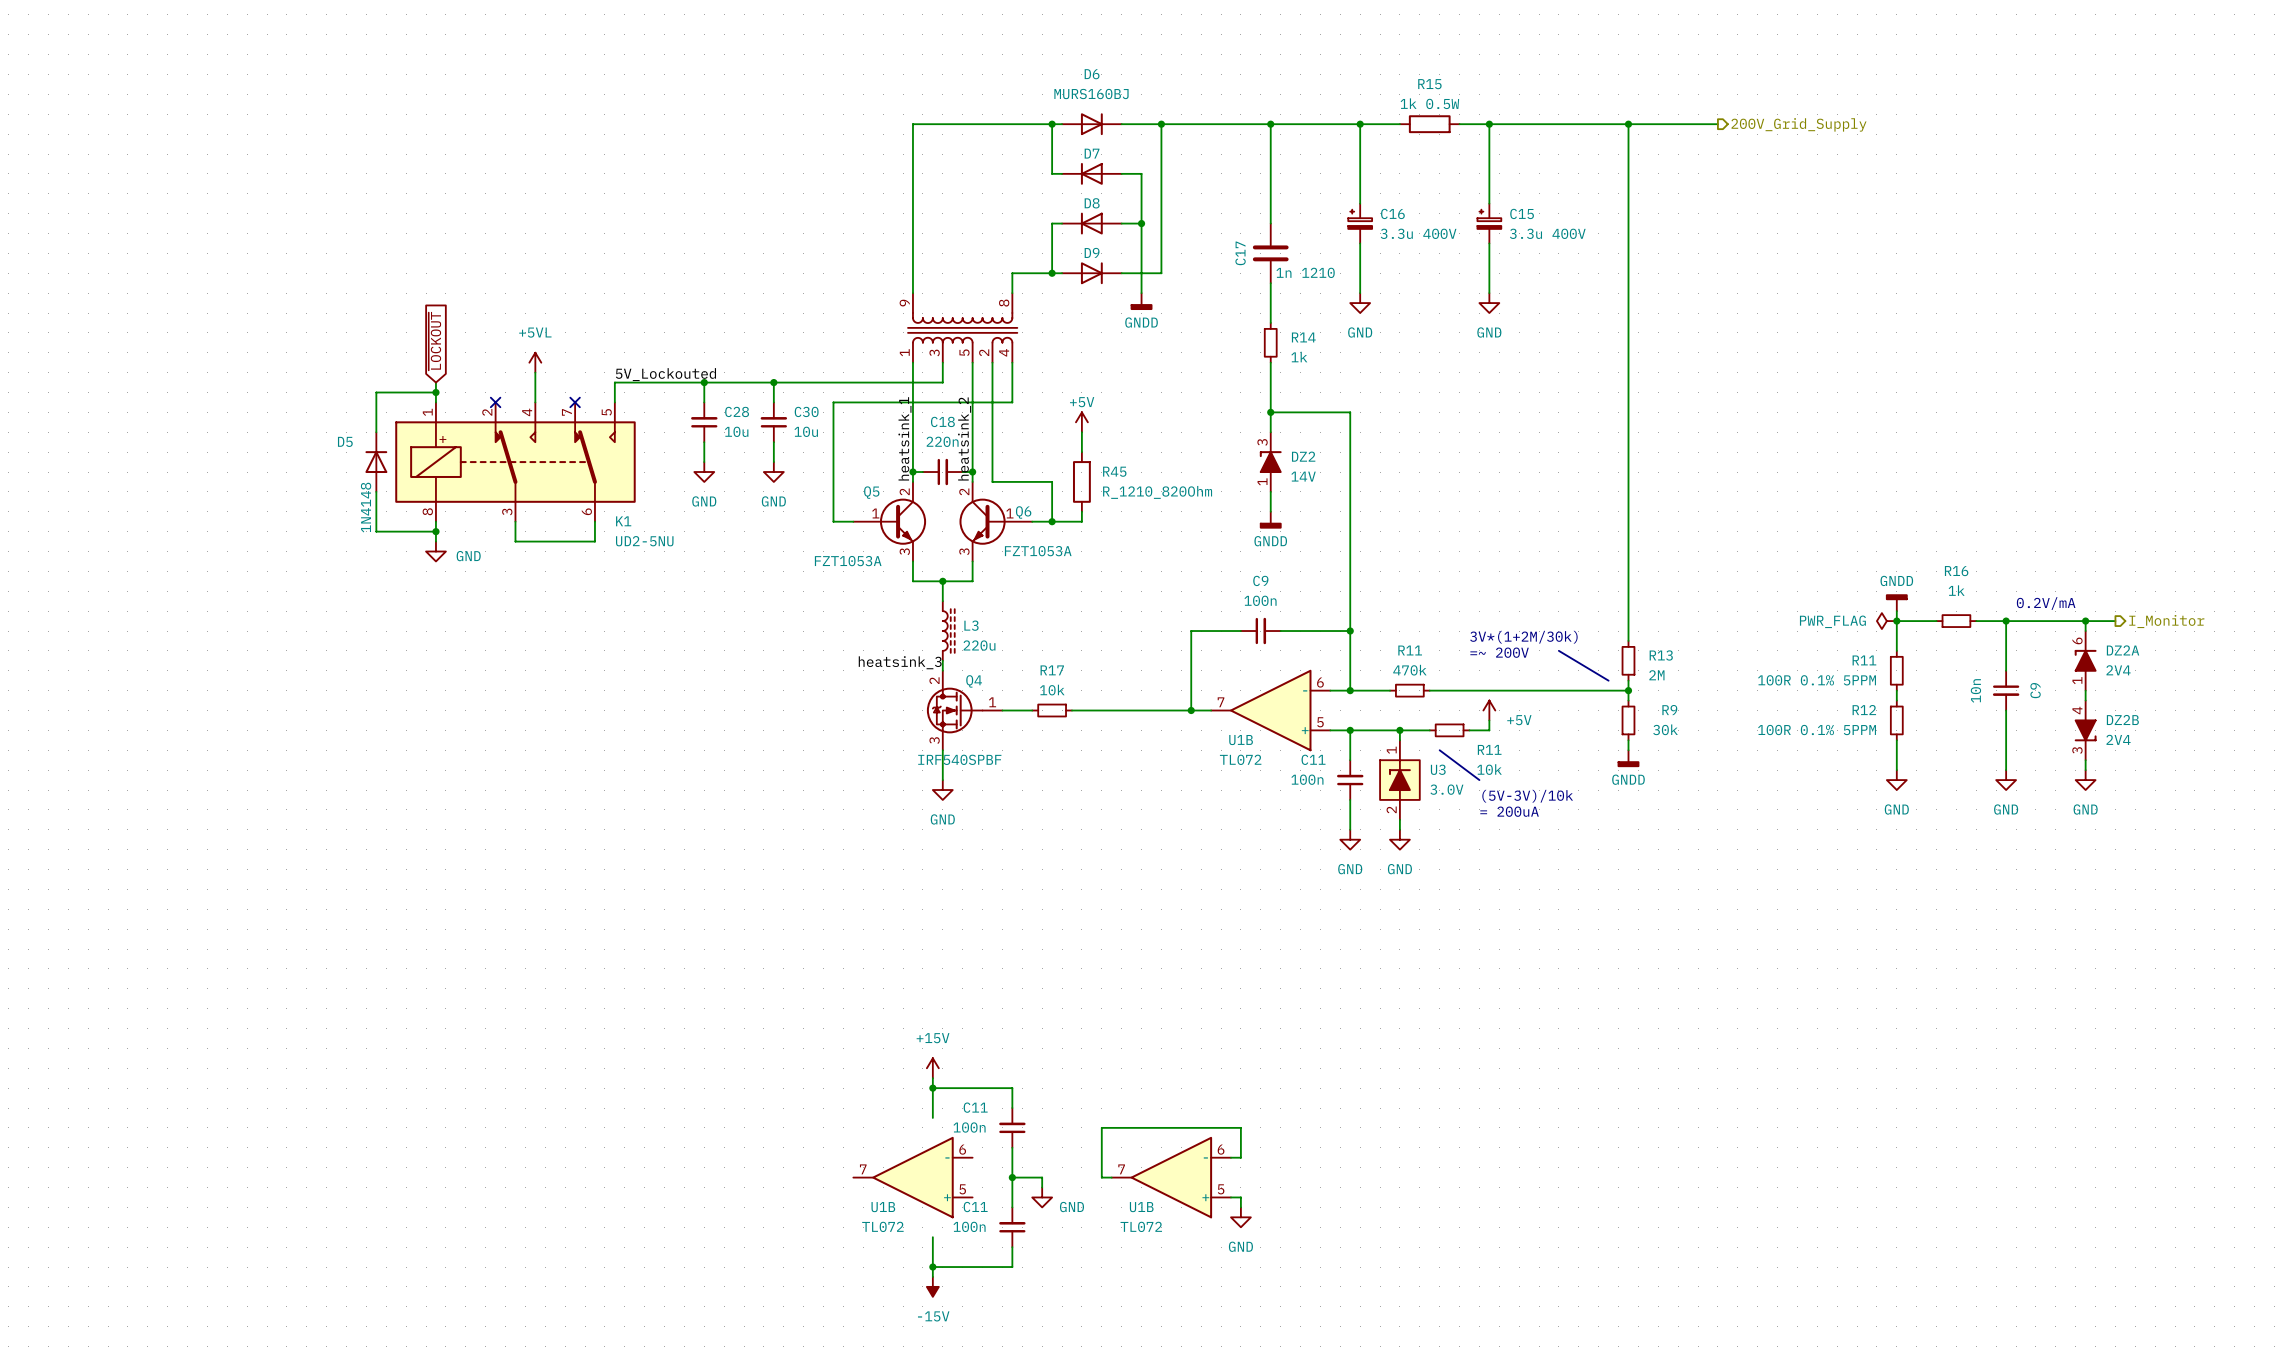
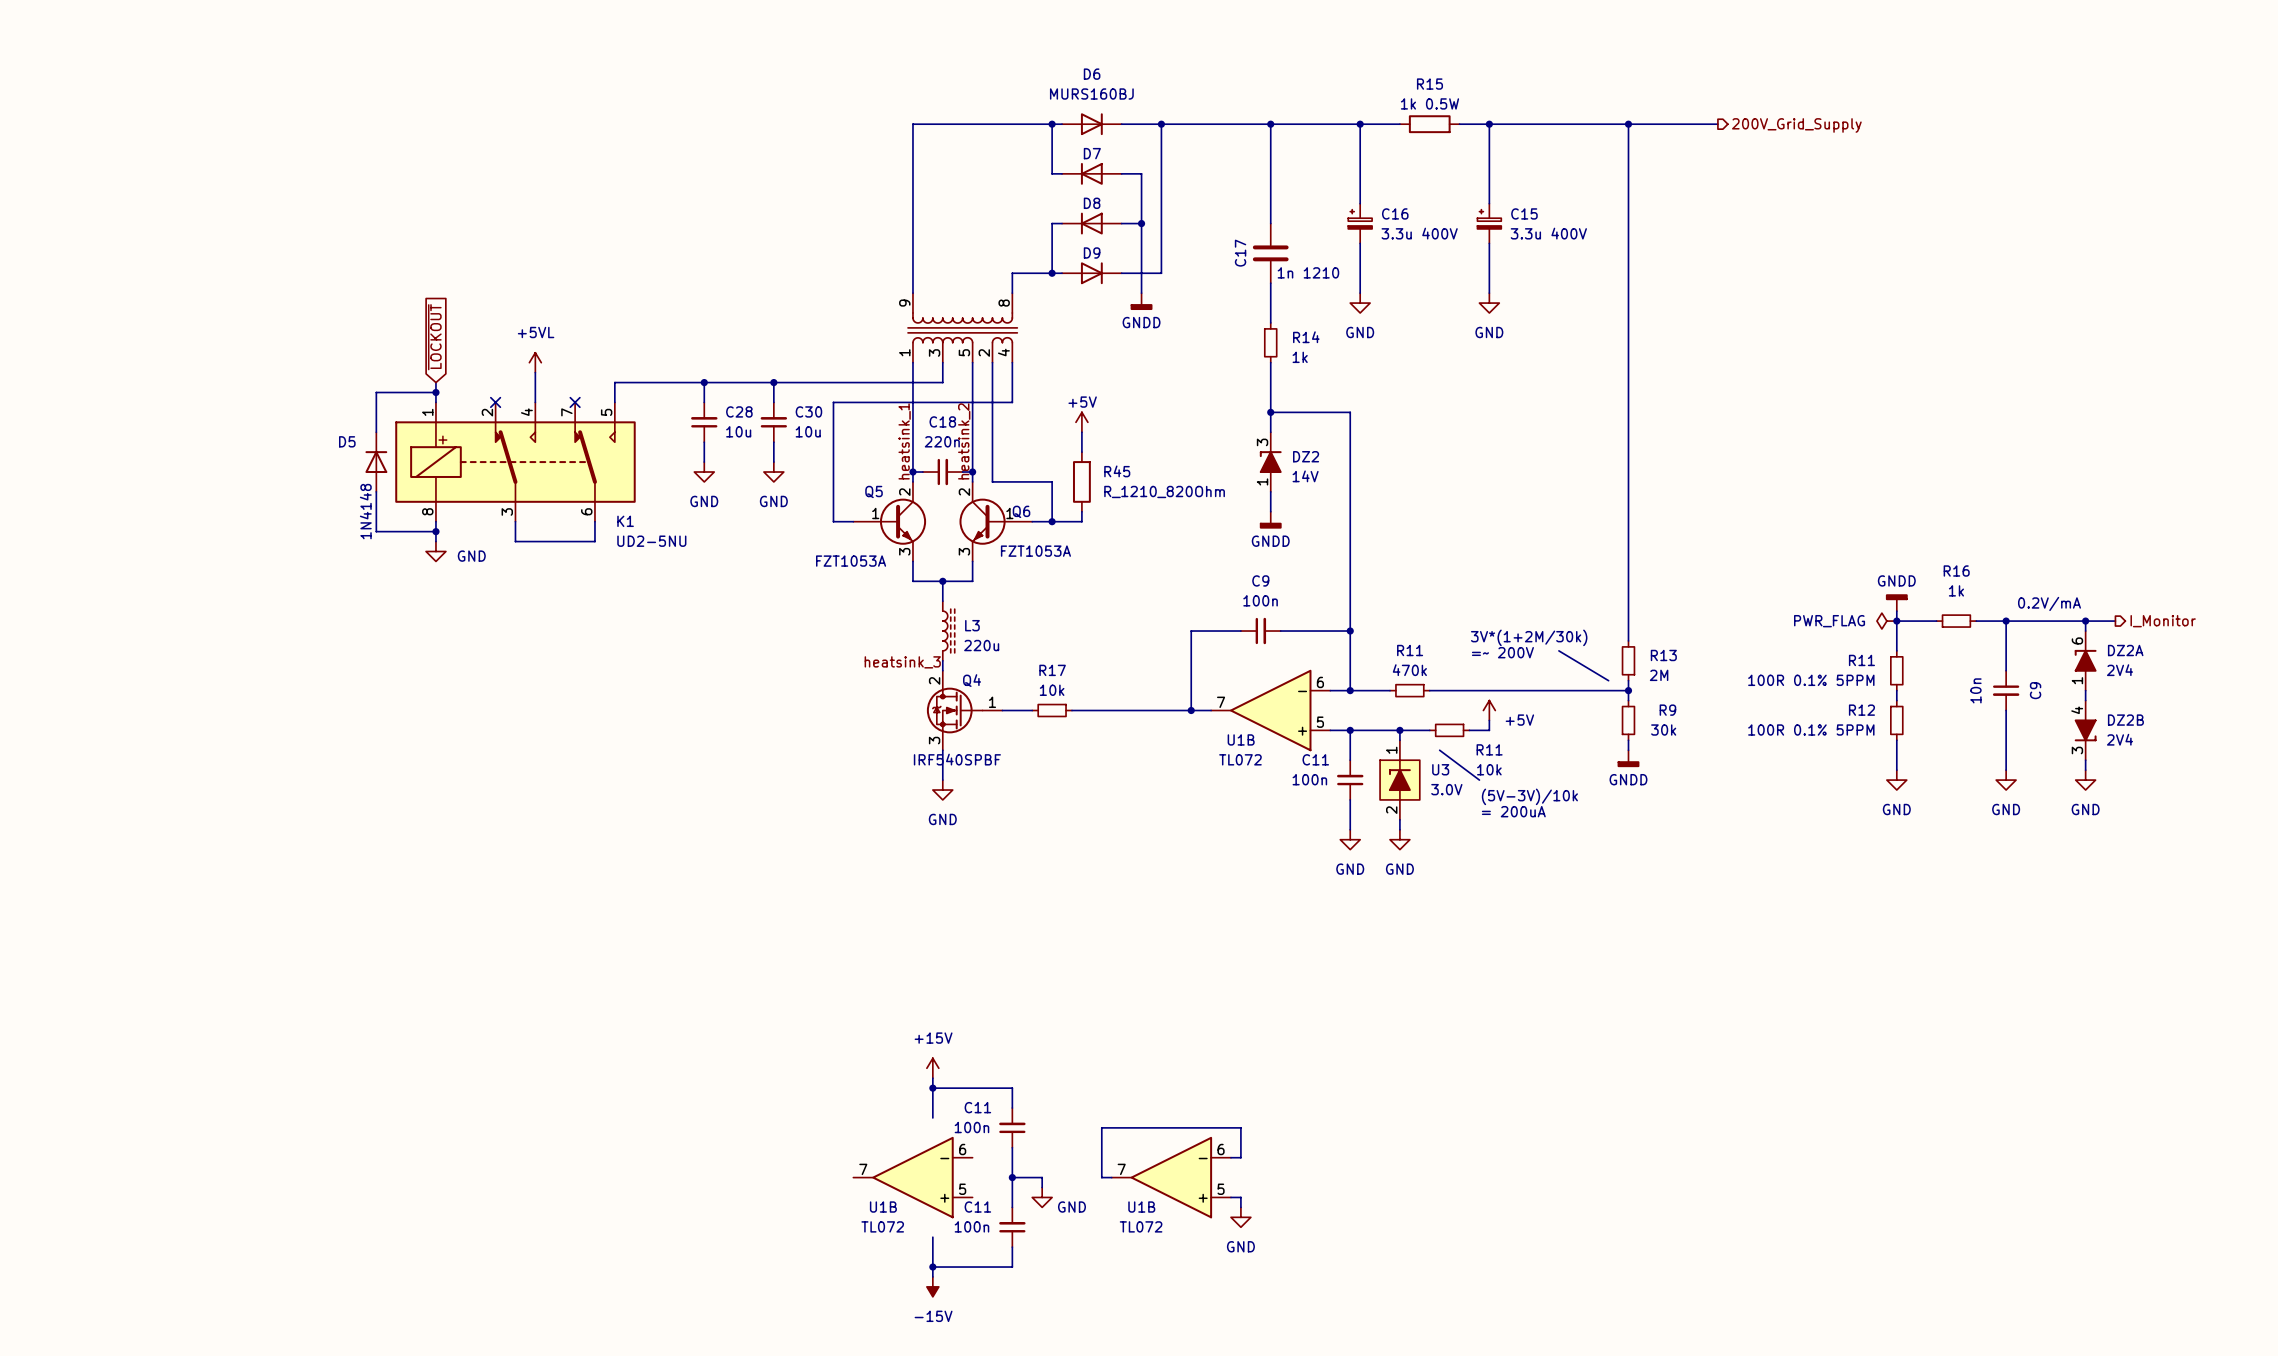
label: 5V_Lockouted (665, 374) -> none

